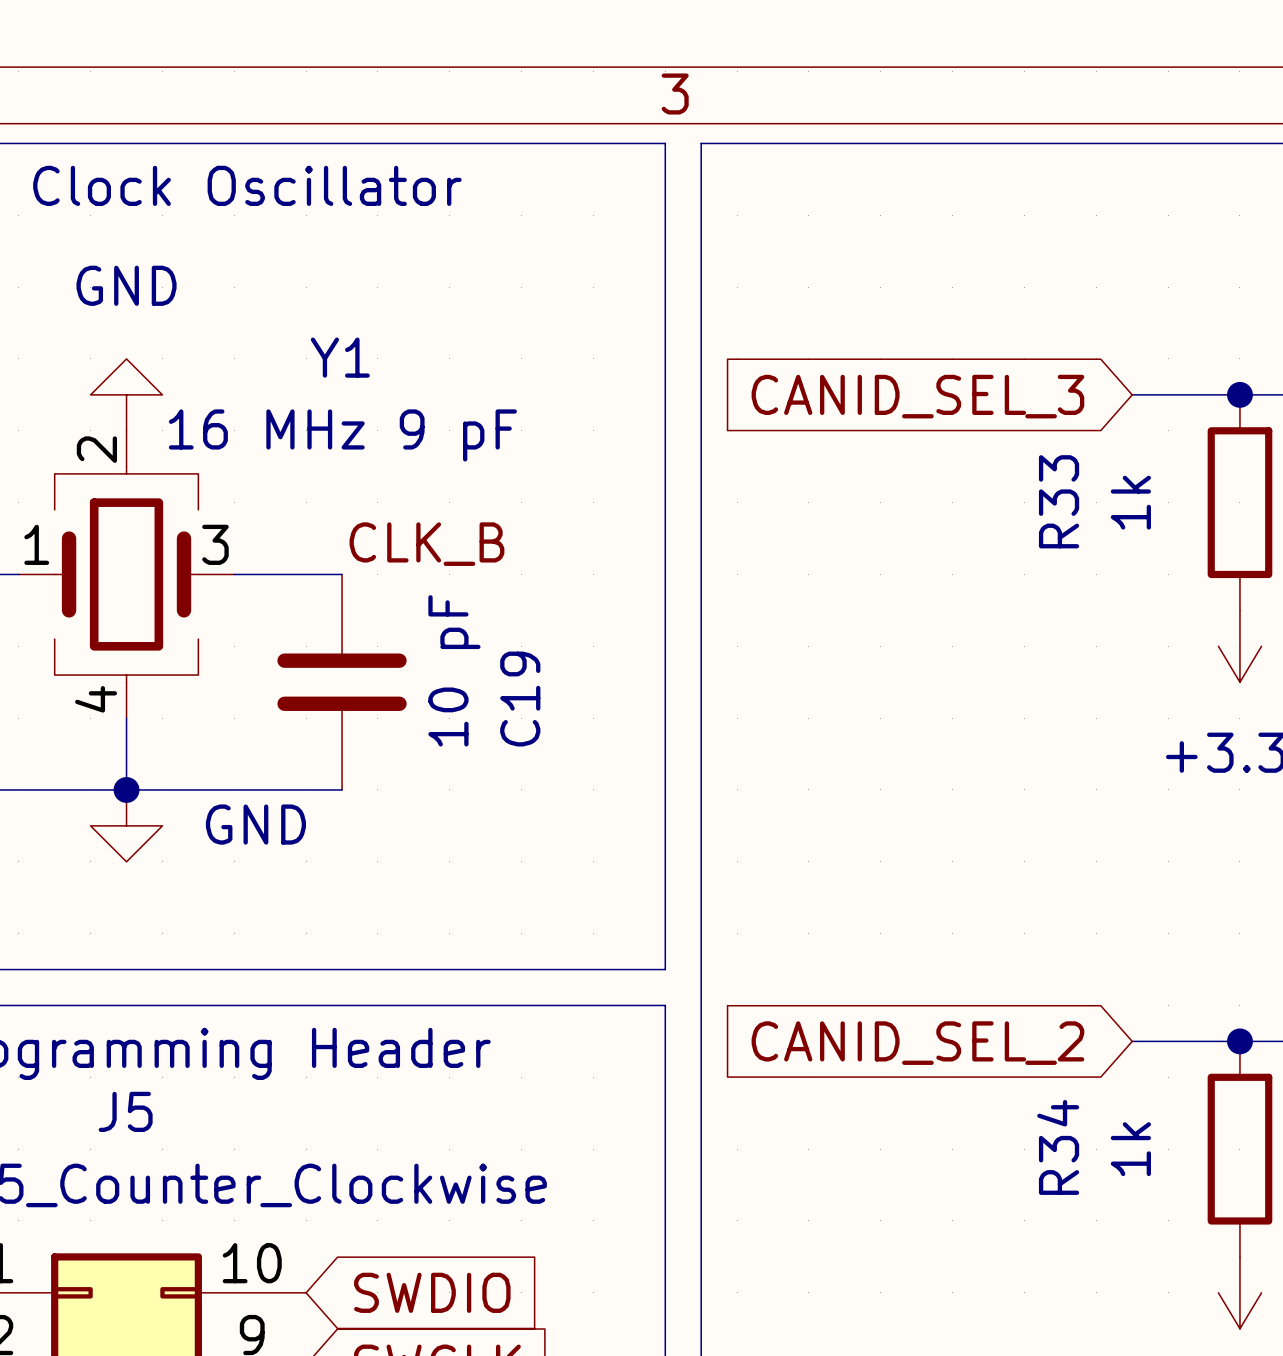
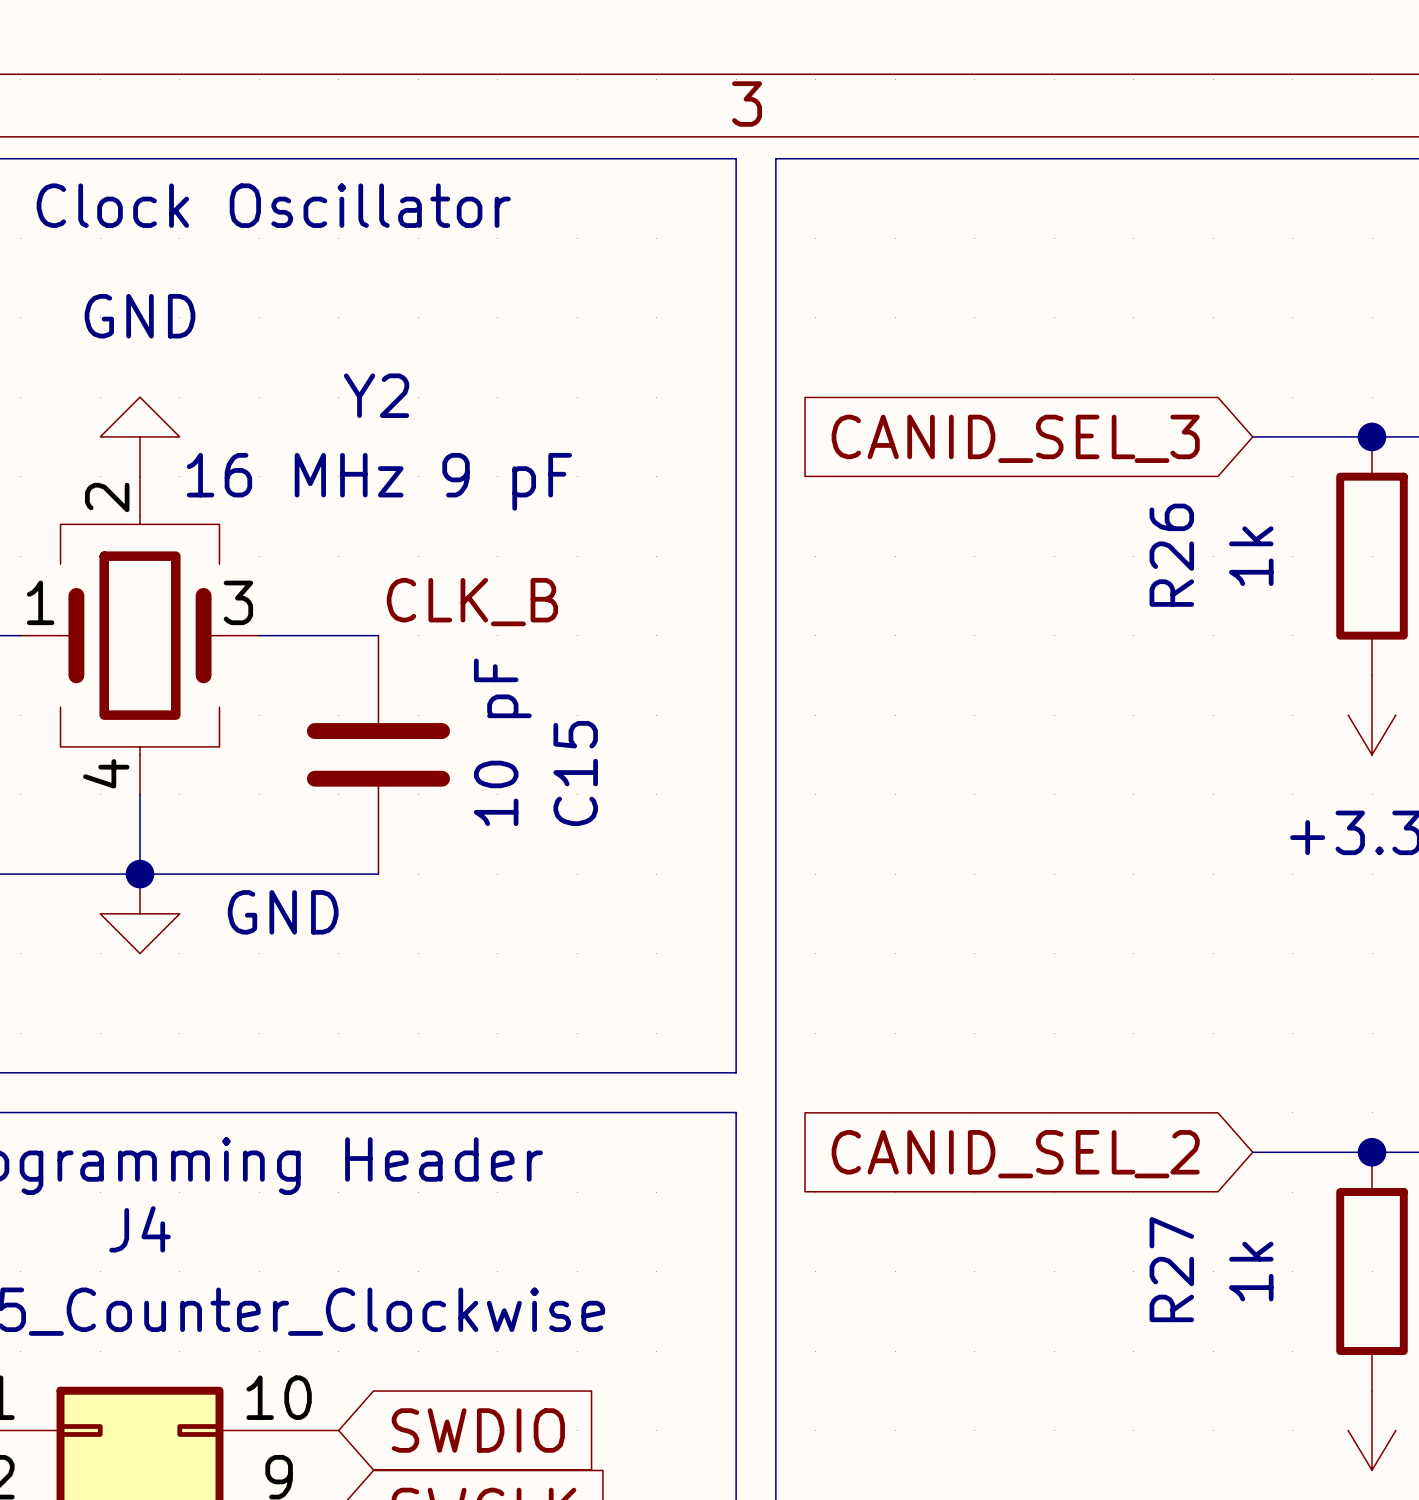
Y1 name: Y1 (340, 357) -> Y2 (376, 395)
R33 name: R33 (1059, 501) -> R26 (1171, 555)
C19 name: C19 (520, 699) -> C15 (575, 773)
J5 name: J5 (125, 1111) -> J4 (140, 1229)
R34 name: R34 (1058, 1147) -> R27 (1171, 1269)

